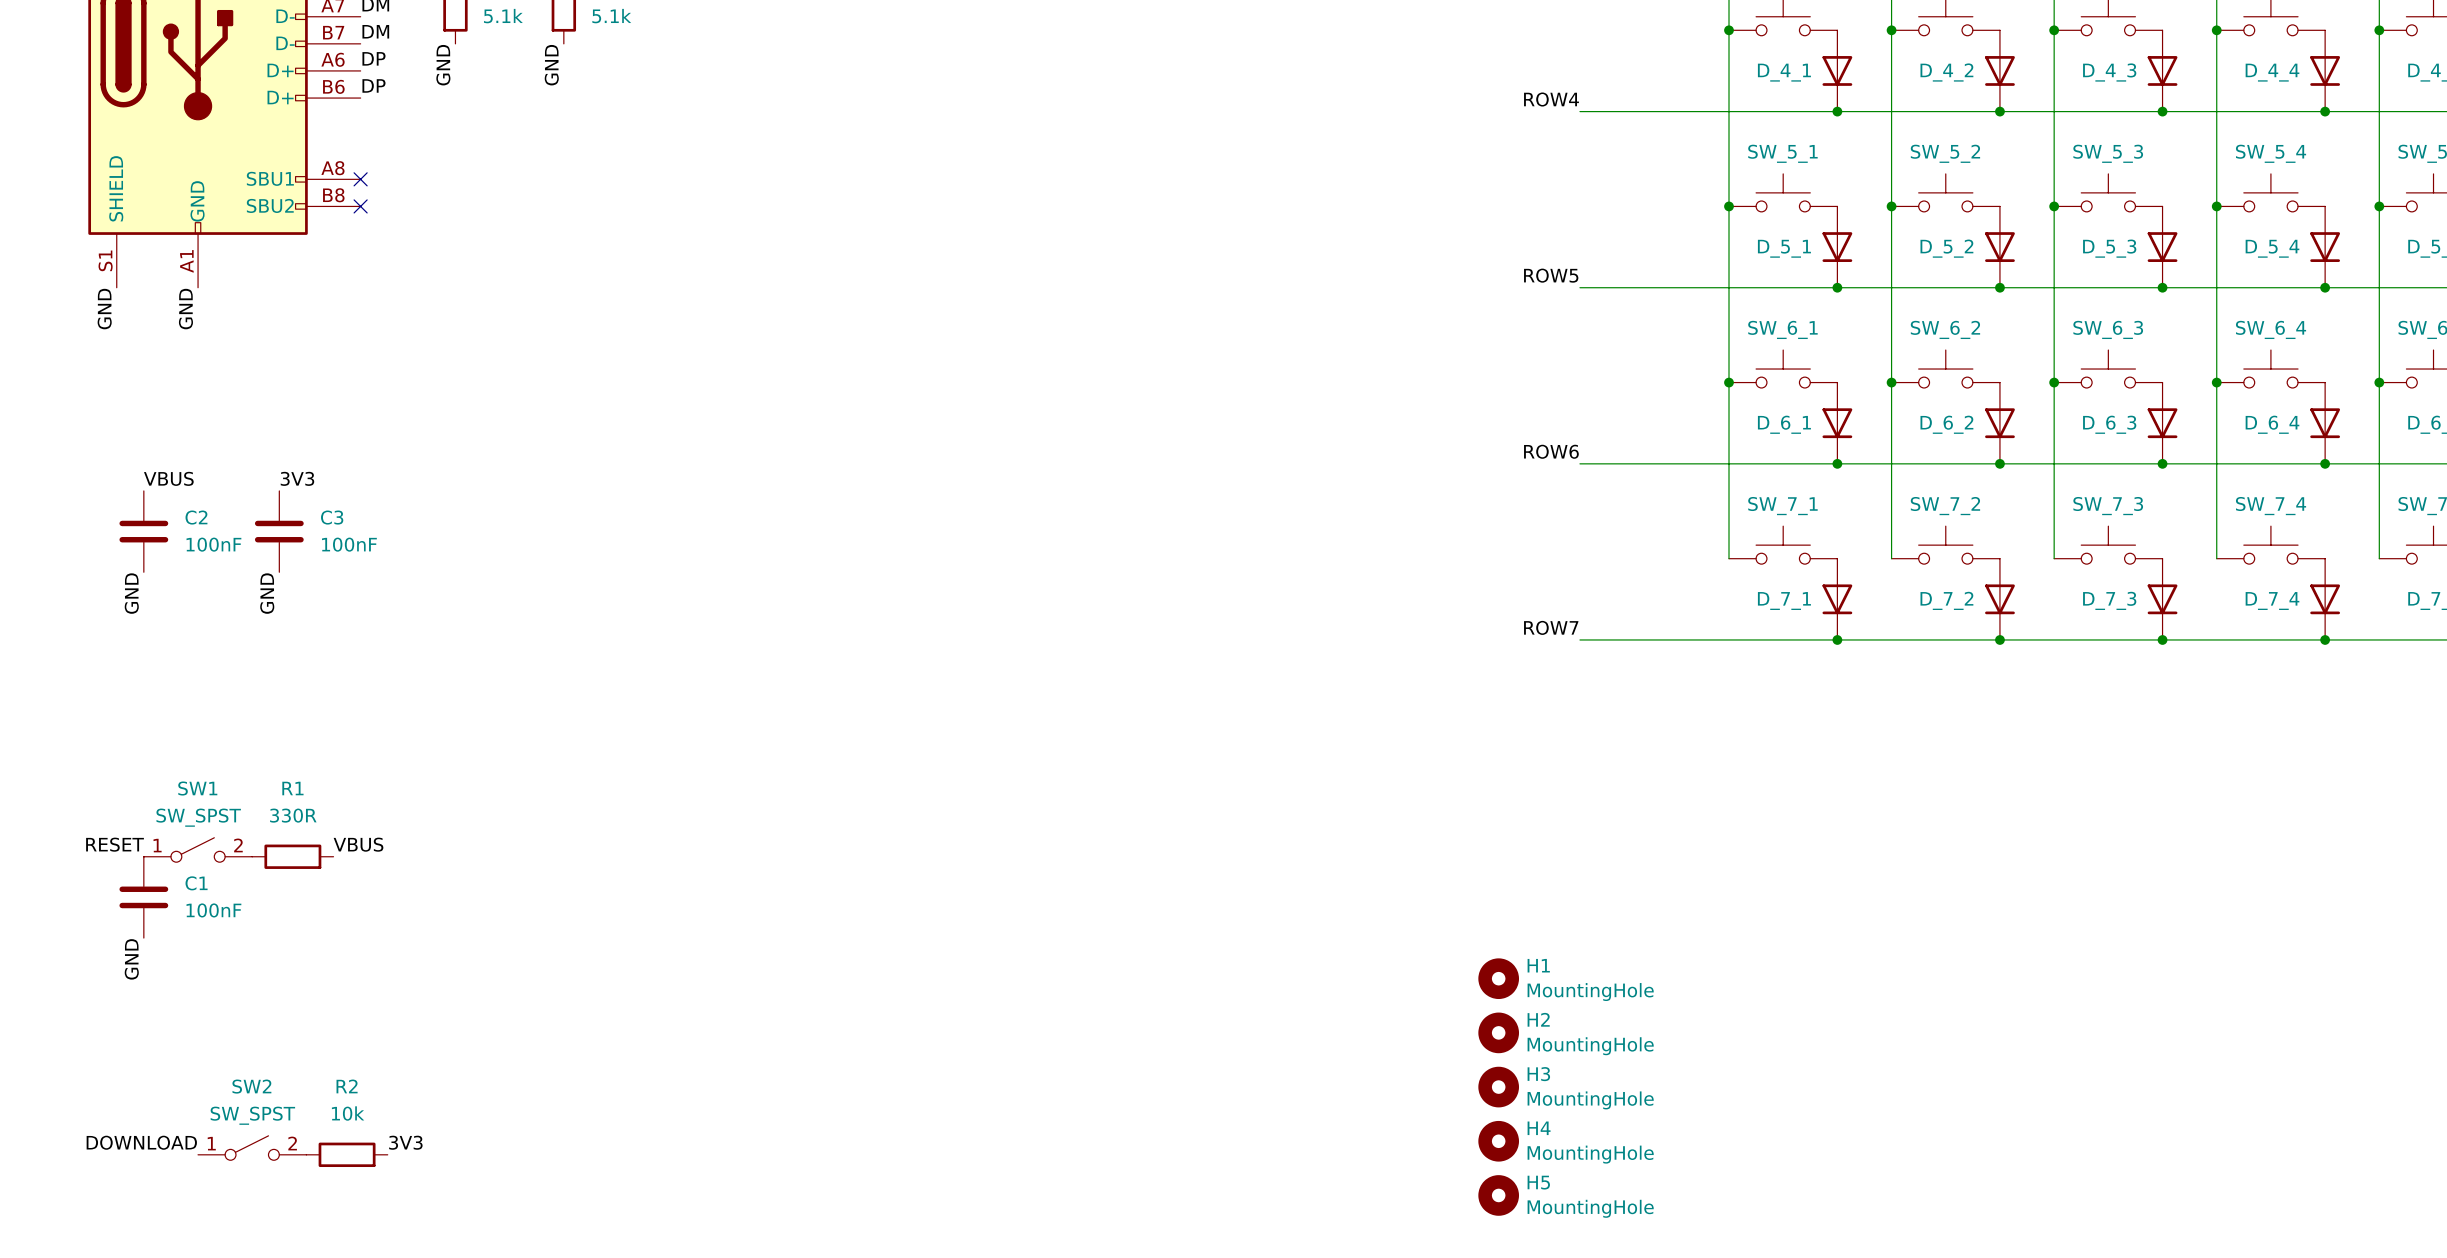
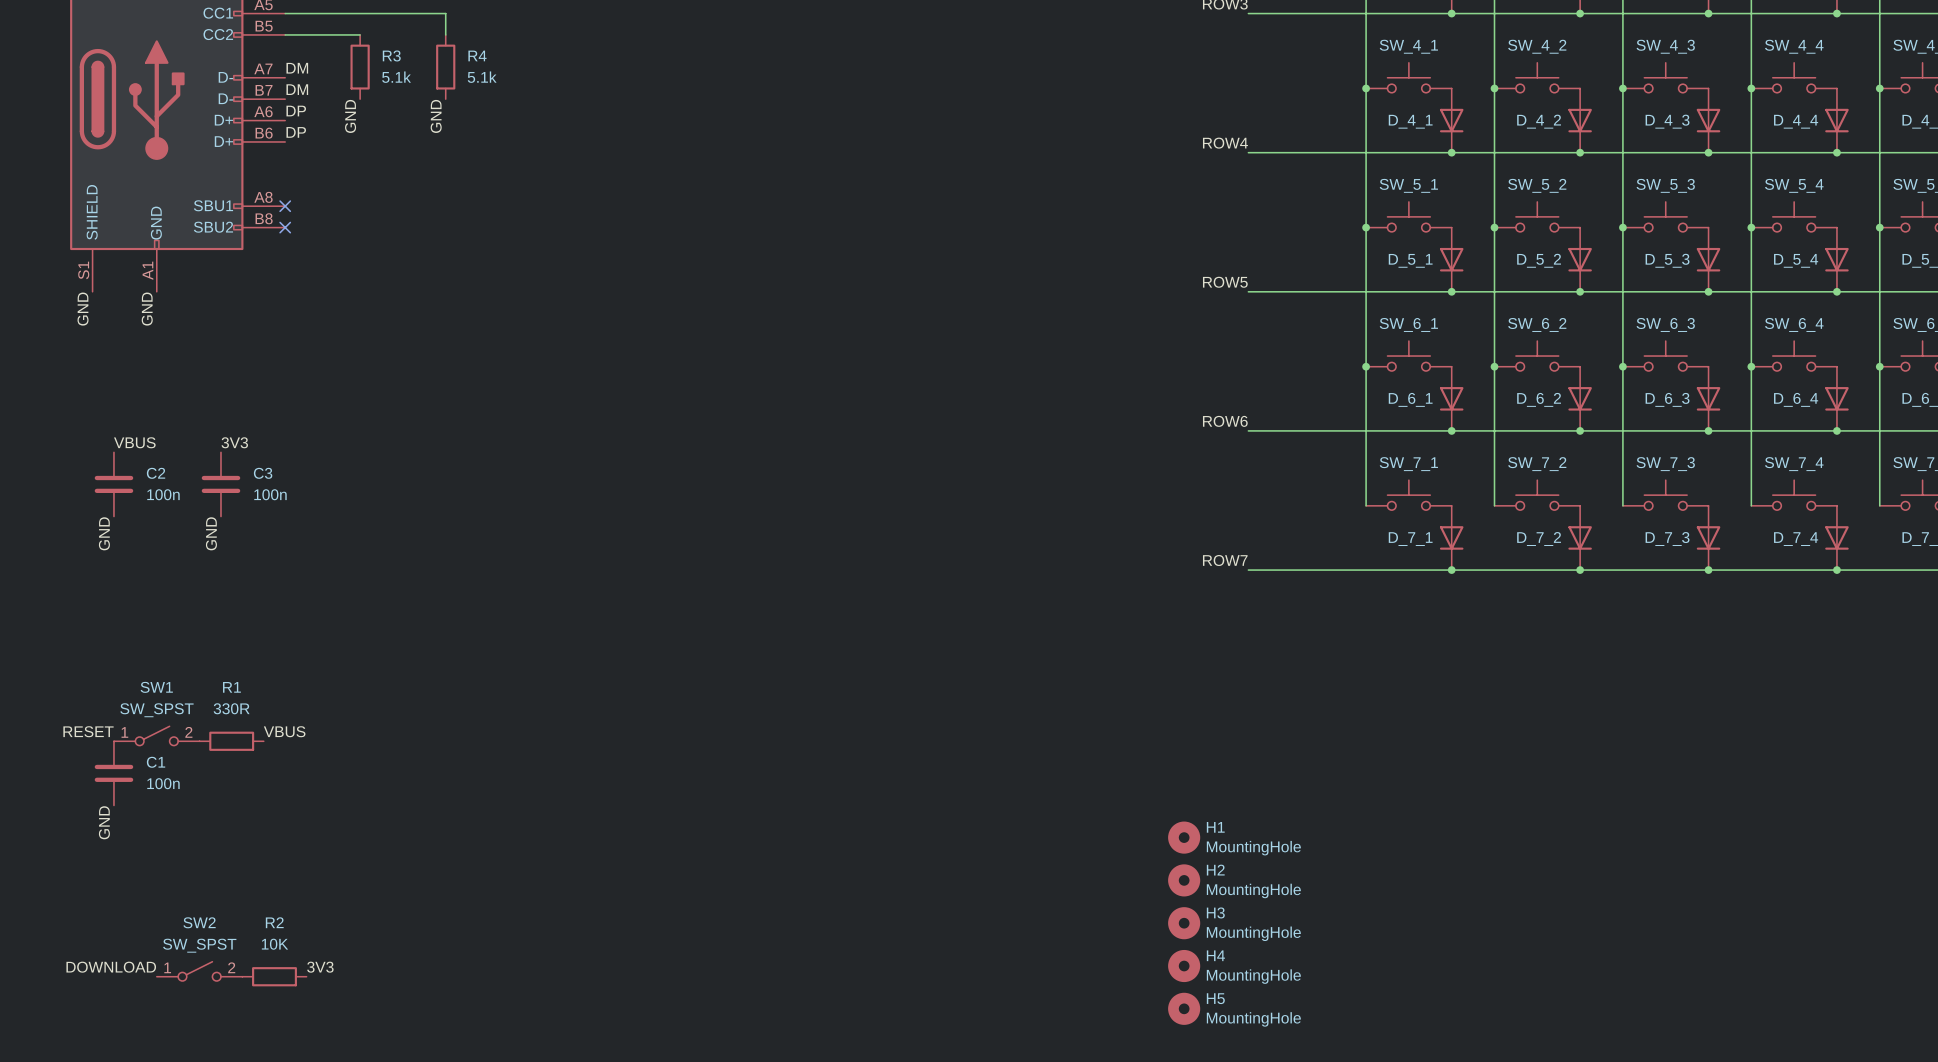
C2 value: 100nF (213, 544) -> 100n (163, 494)
C3 value: 100nF (349, 544) -> 100n (270, 494)
C1 value: 100nF (213, 910) -> 100n (163, 783)
R2 value: 10k (348, 1113) -> 10K (275, 944)

